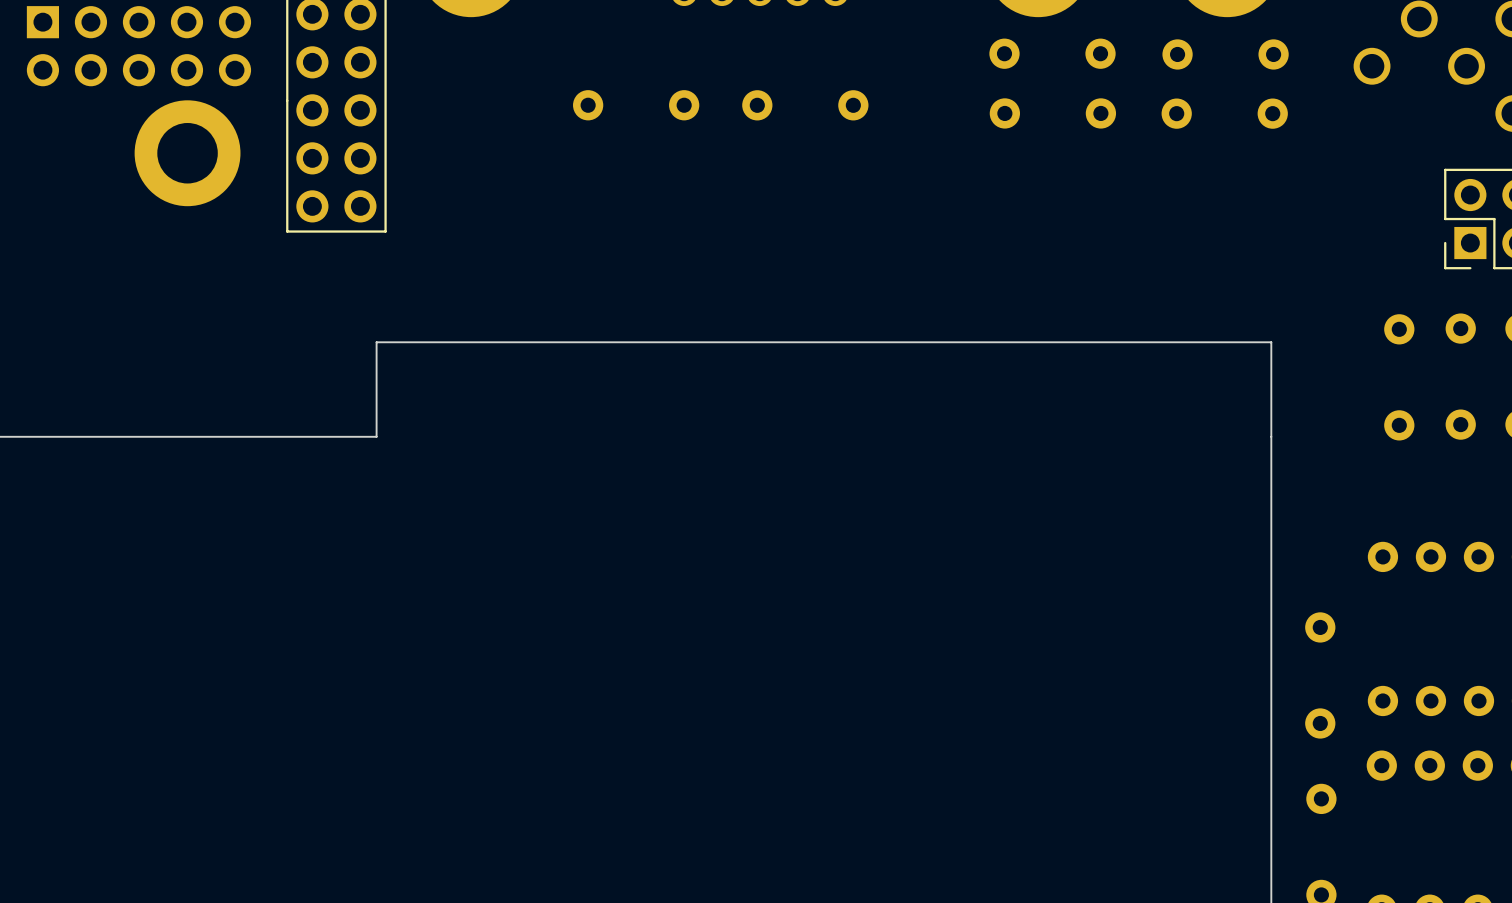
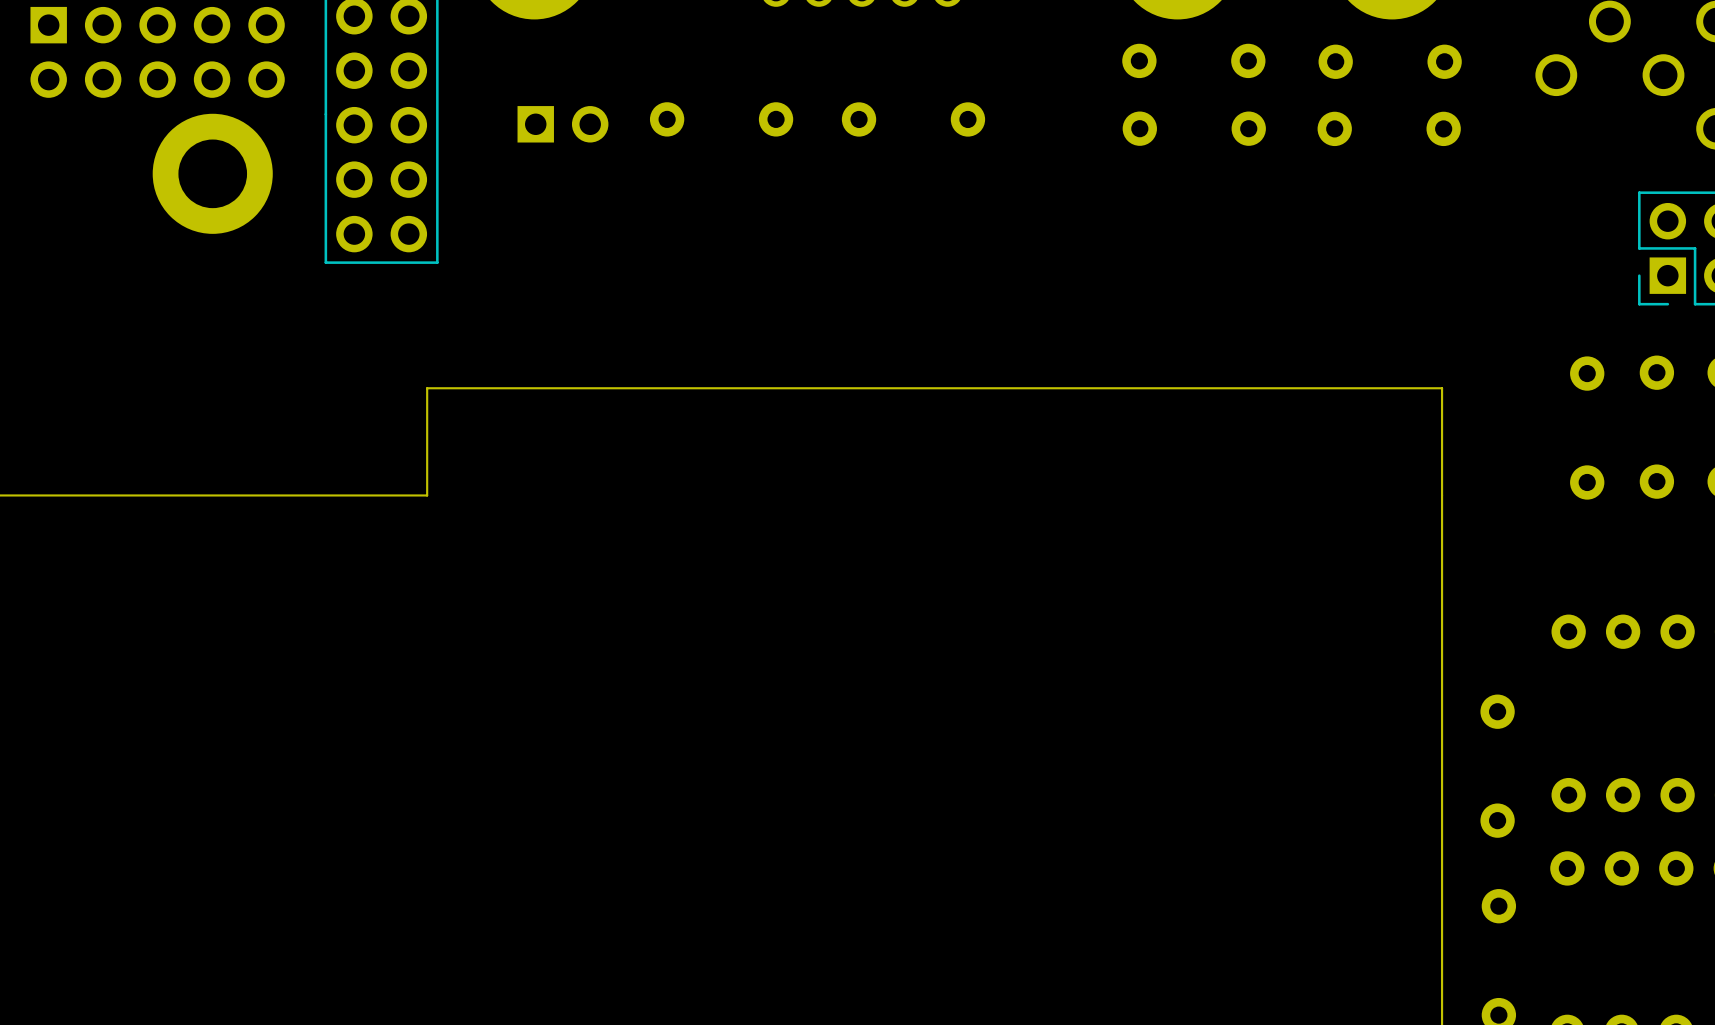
part: none -> (562, 124)

